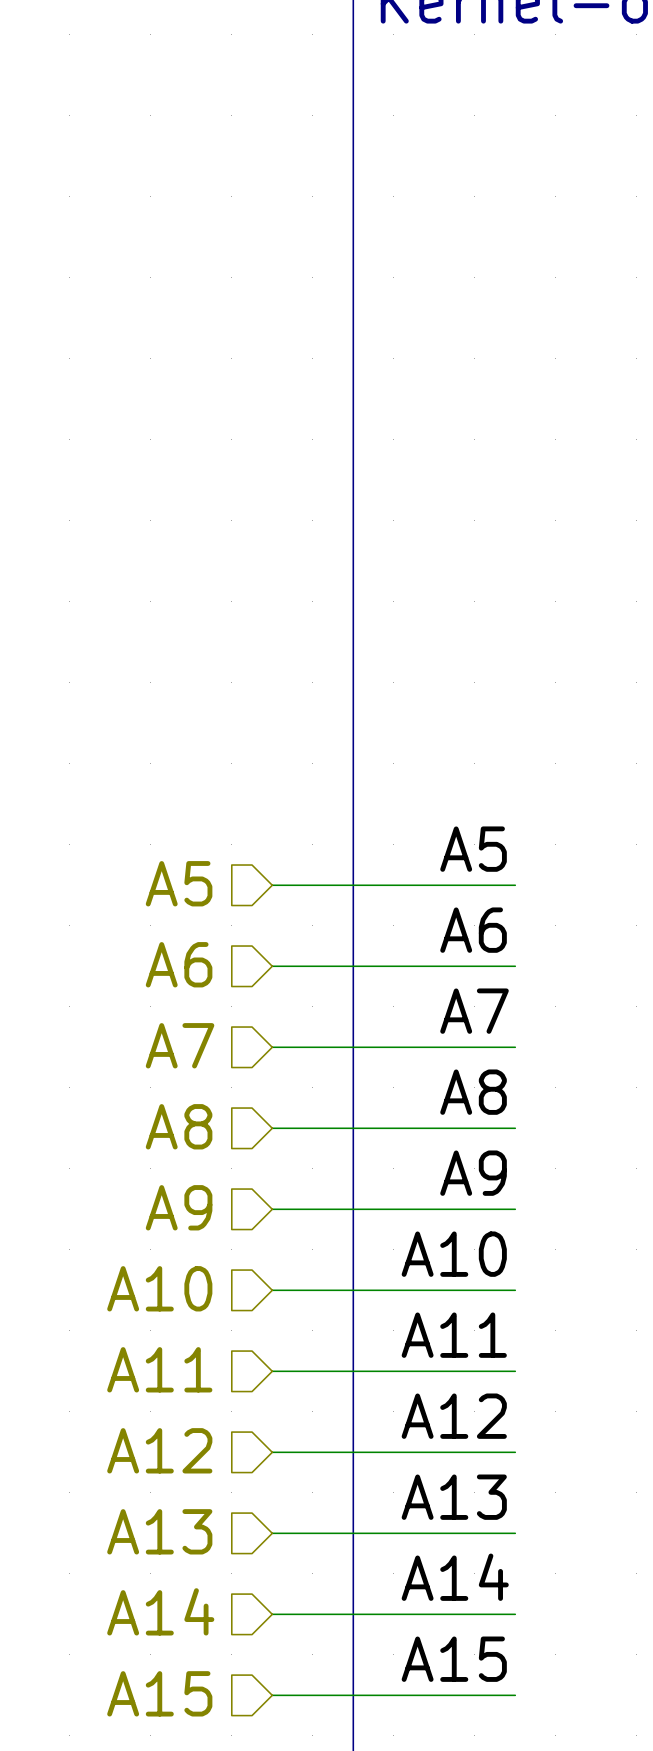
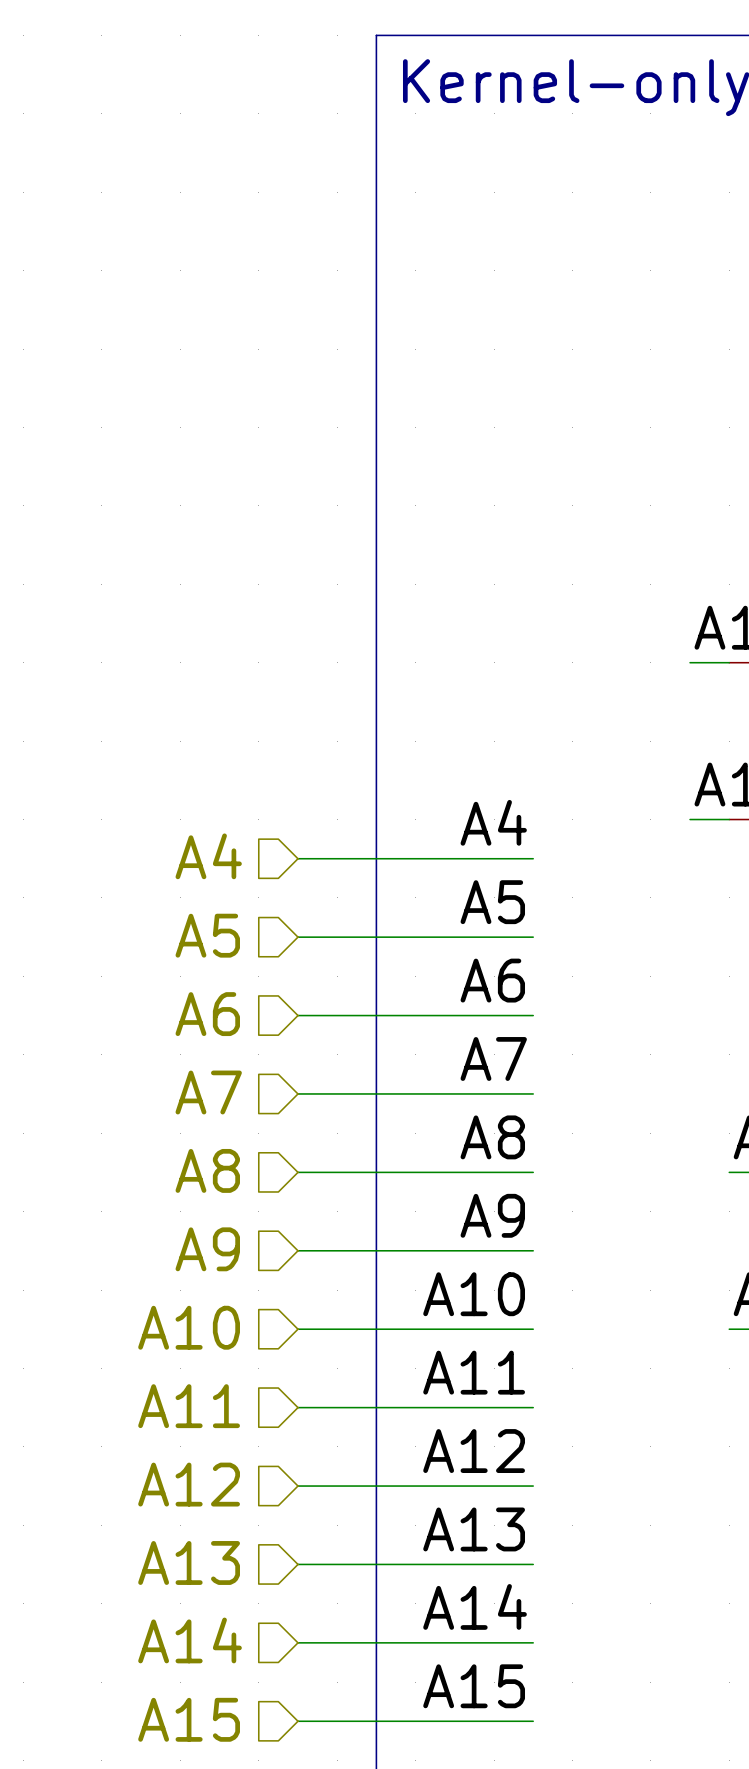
label: none -> A4 (493, 822)
hierarchical label: none -> A4 (208, 856)
wire: none -> (297, 858) (533, 858)

